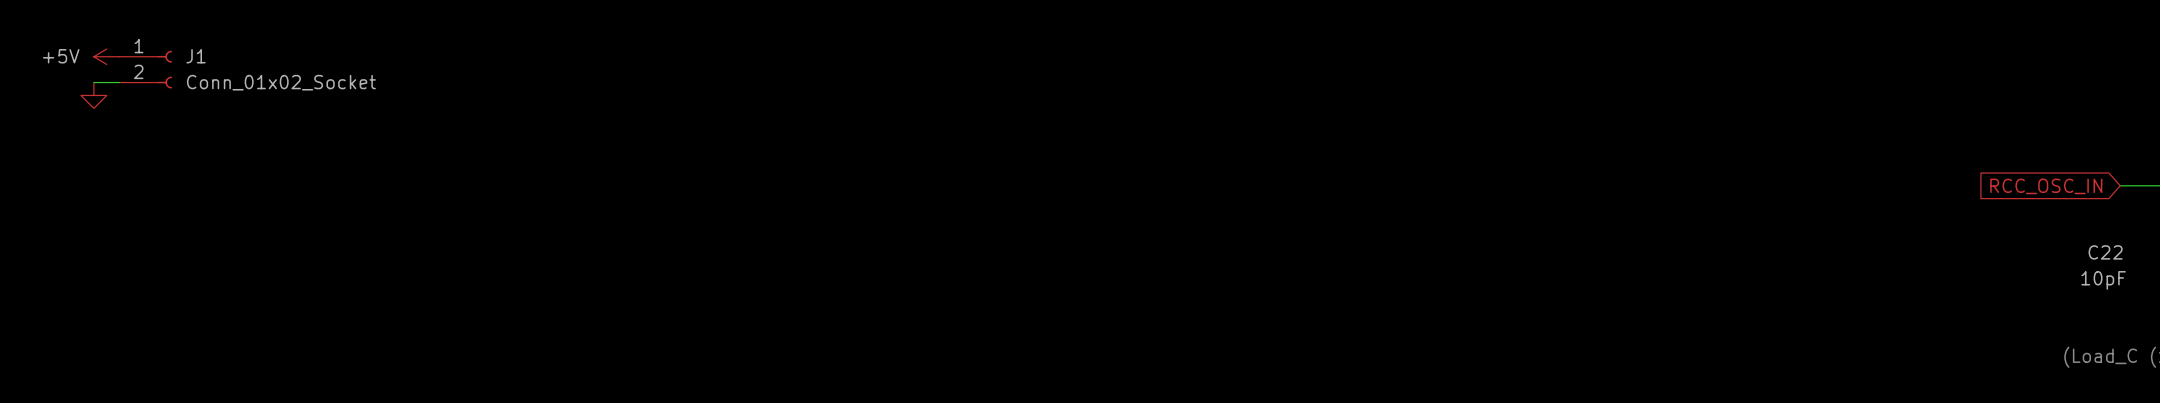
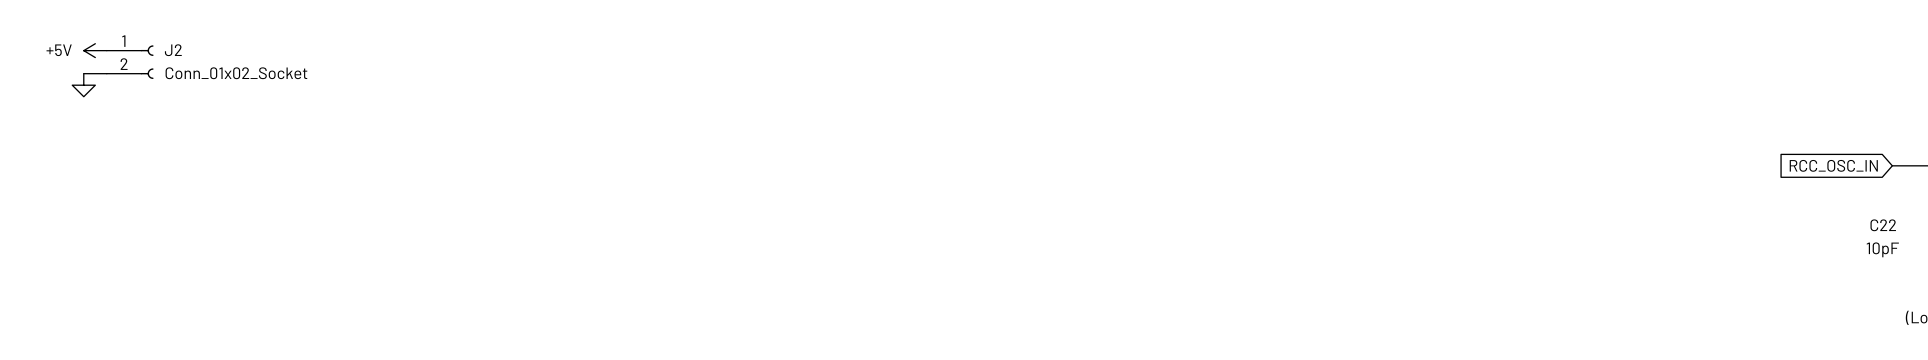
J1 name: J1 (195, 56) -> J2 (173, 50)

